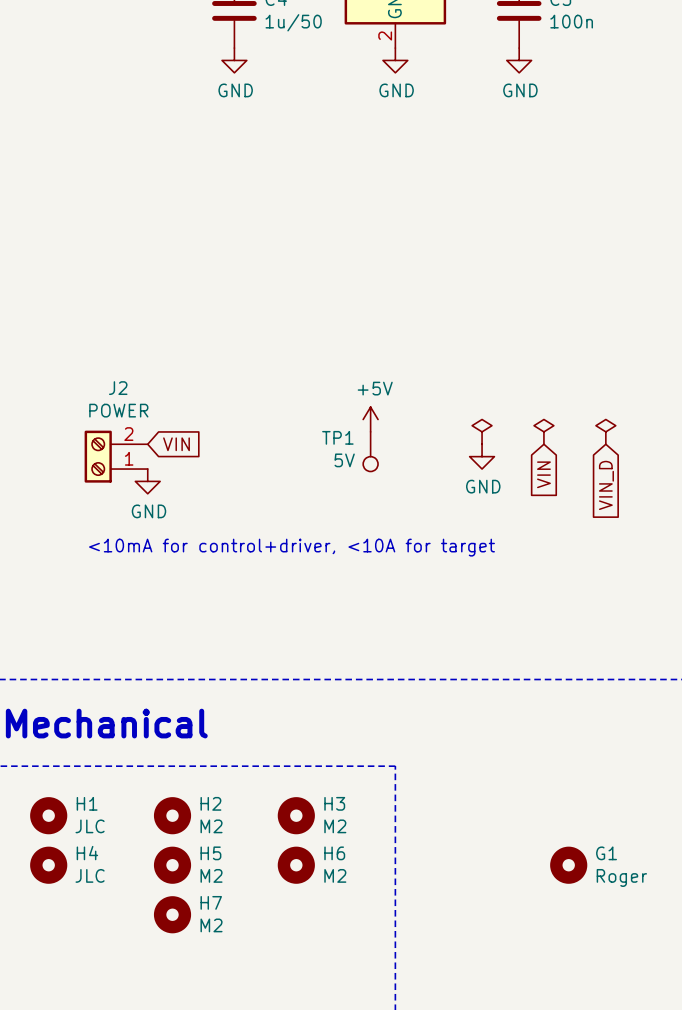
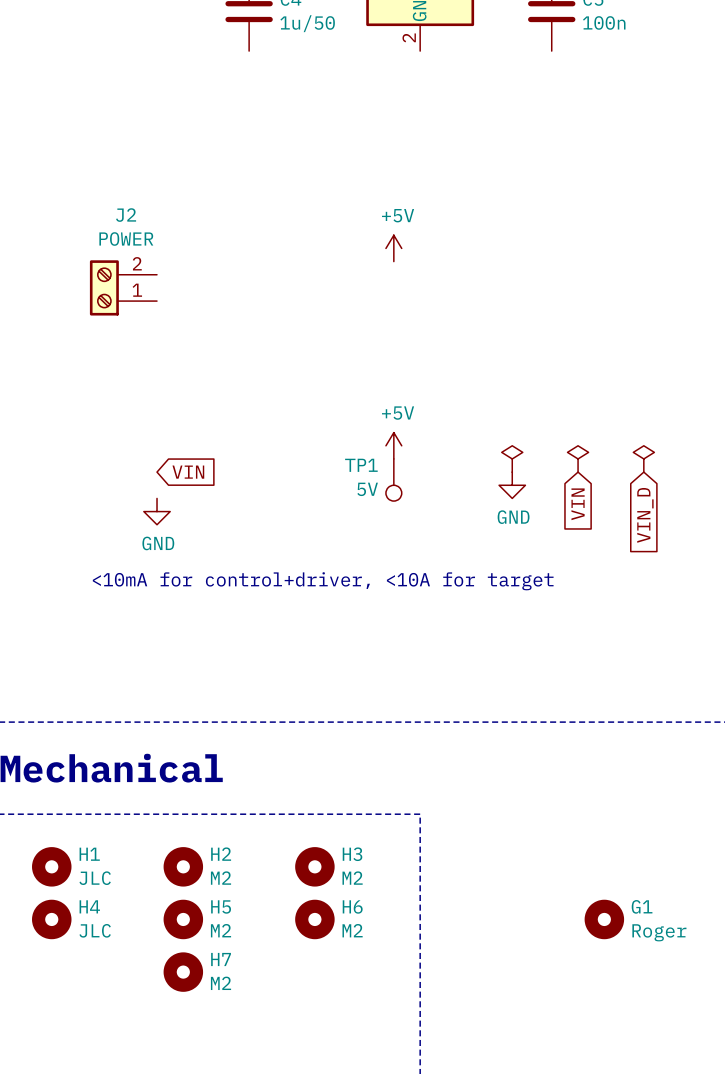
power symbol: GND (234, 60) -> none
power symbol: GND (395, 60) -> none
power symbol: GND (519, 60) -> none
power symbol: none -> +5V (393, 248)
J2 position: (116, 456) -> (123, 287)

